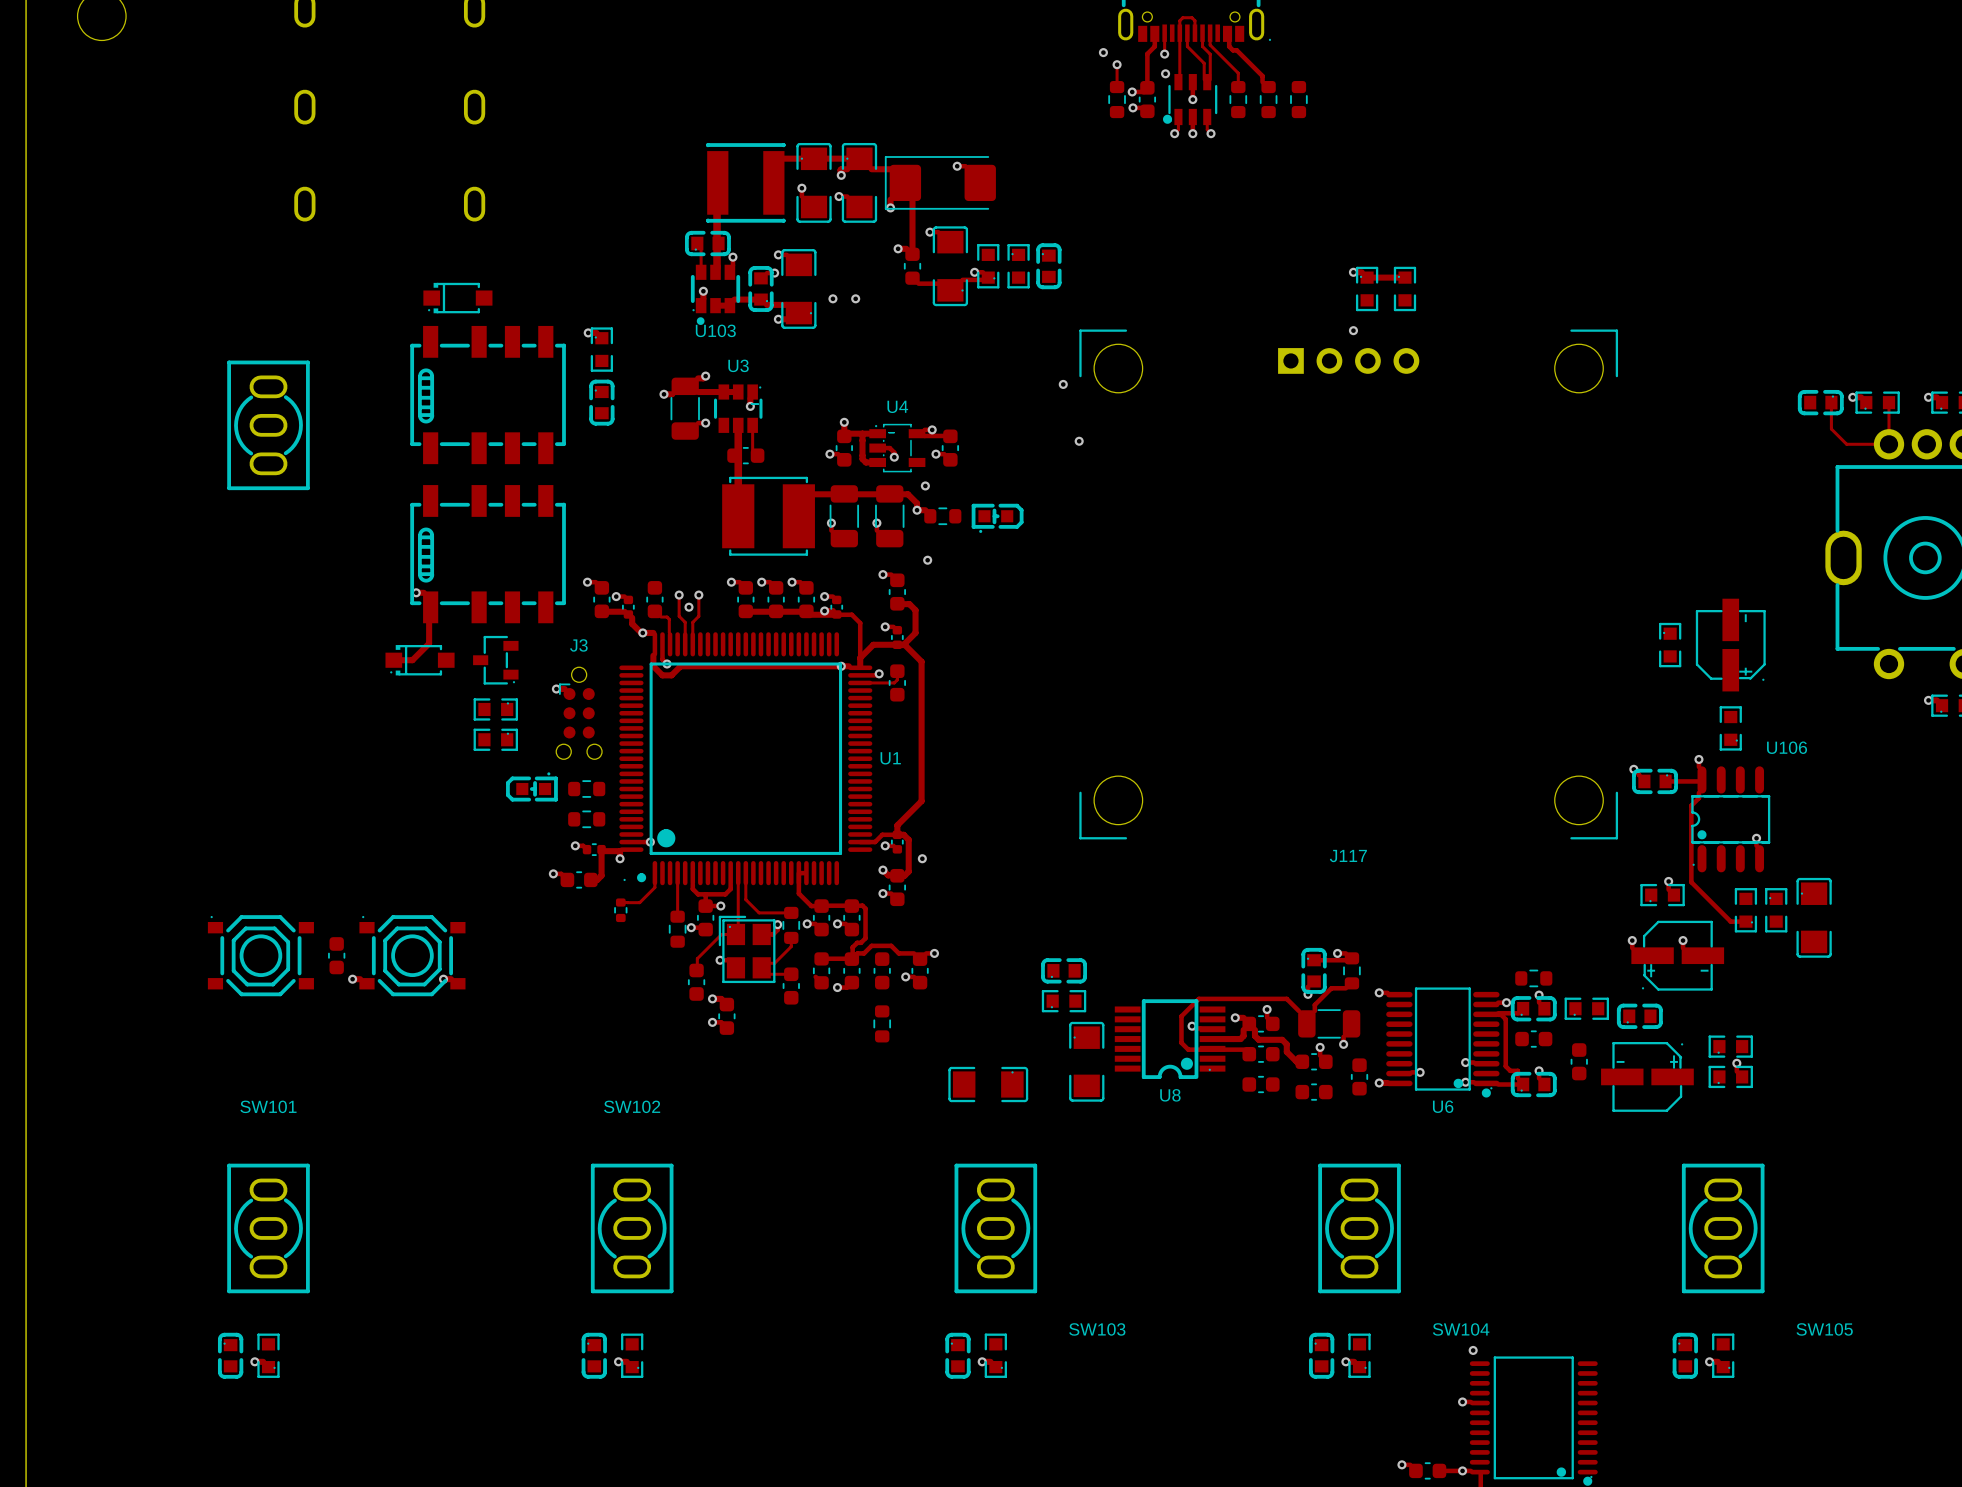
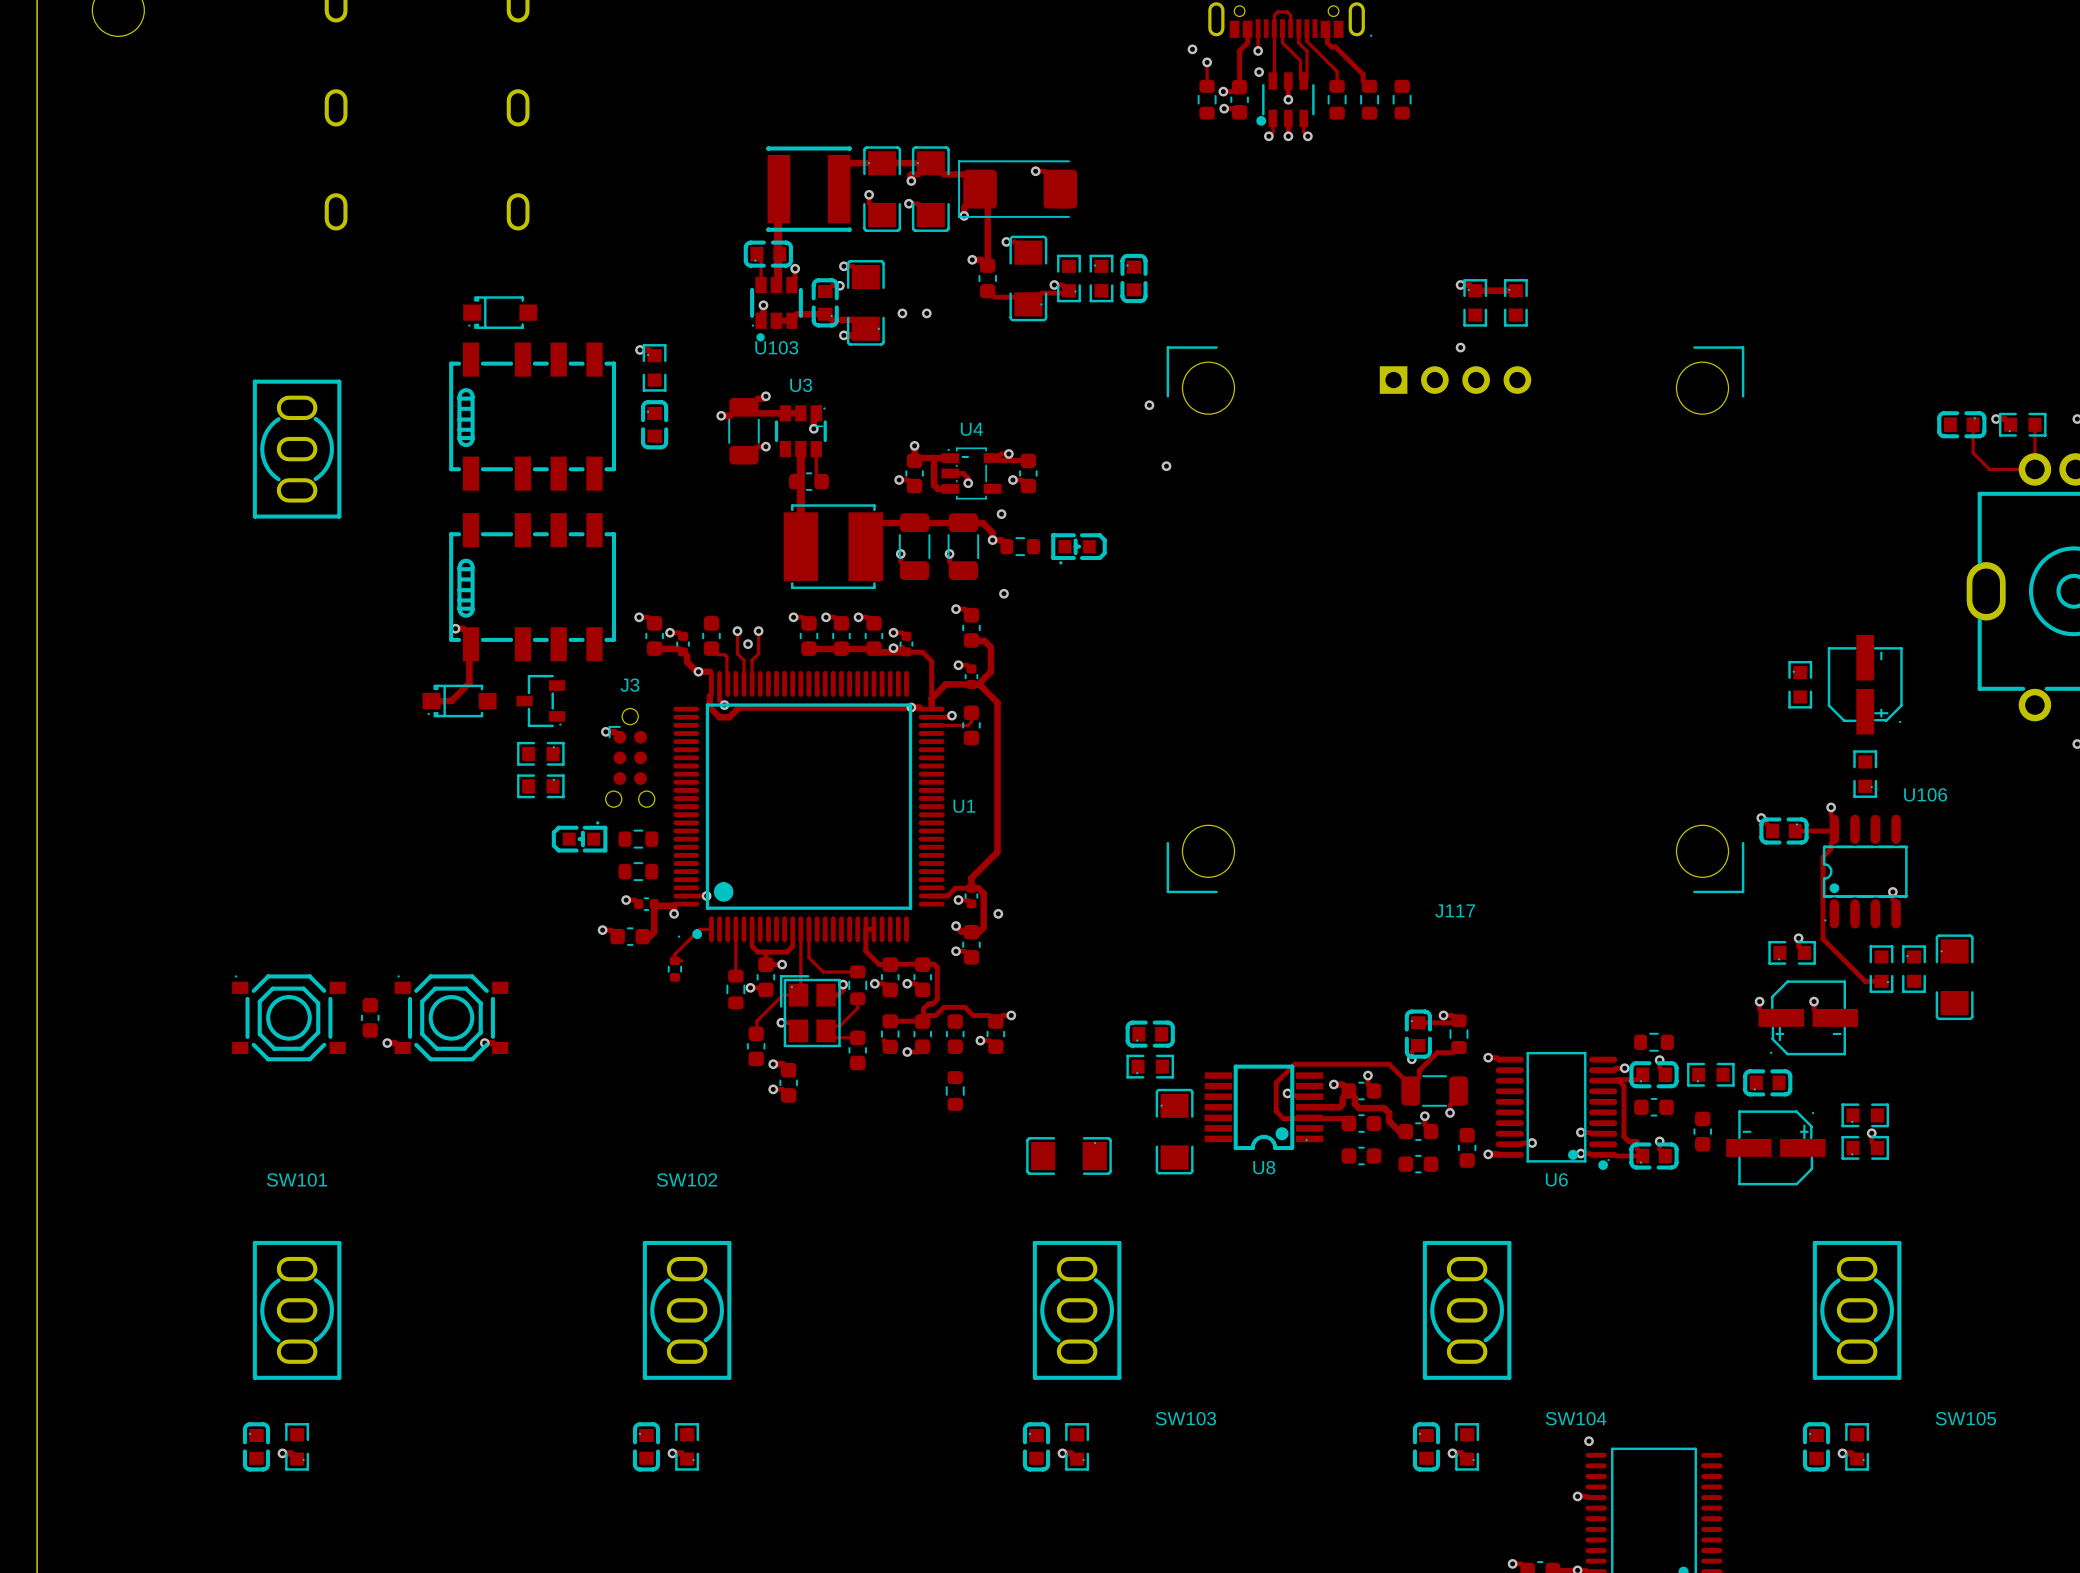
track: (654, 873) (654, 887) (639, 902) (627, 902) -> (711, 929) (699, 929) (674, 954) (674, 960)

